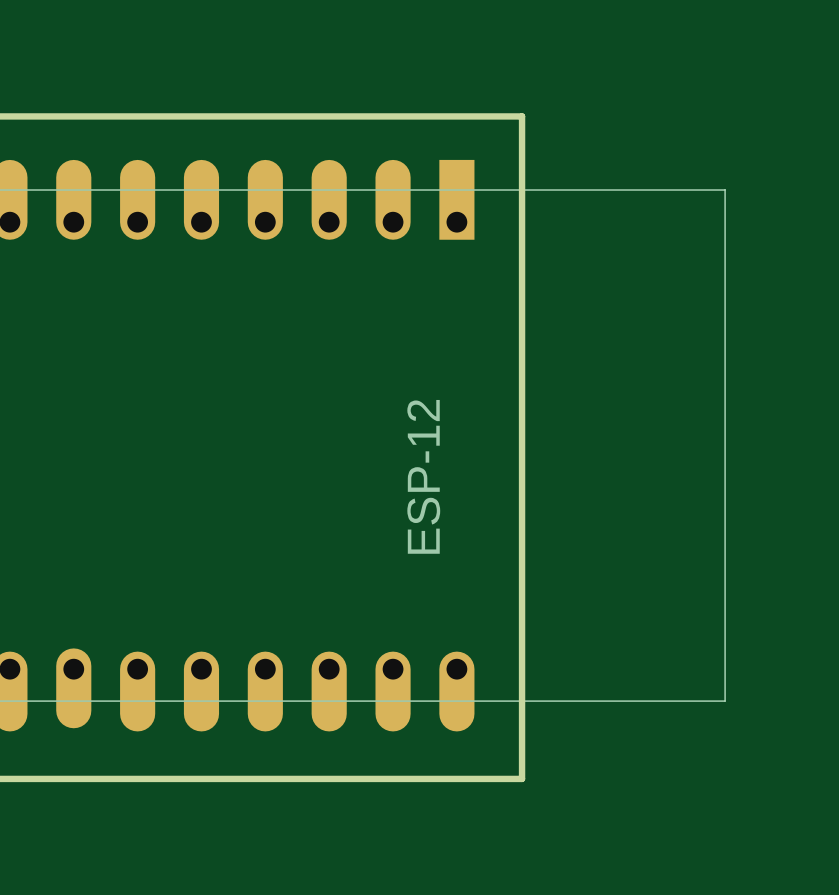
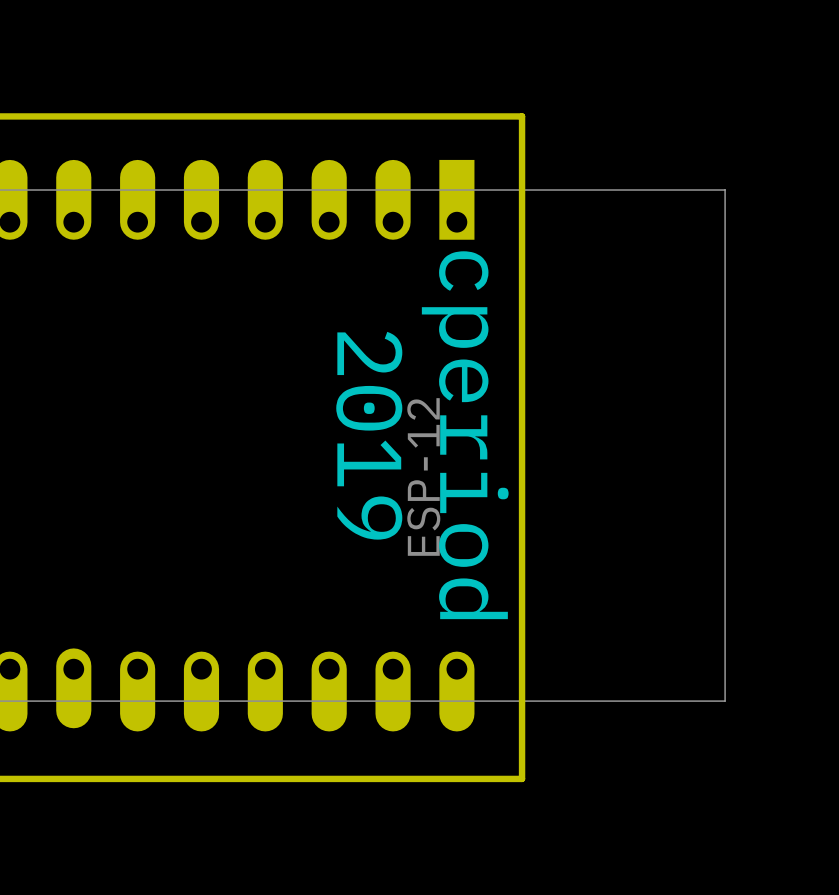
text: none -> cperiod (465, 435)
text: none -> 2019 (369, 435)

